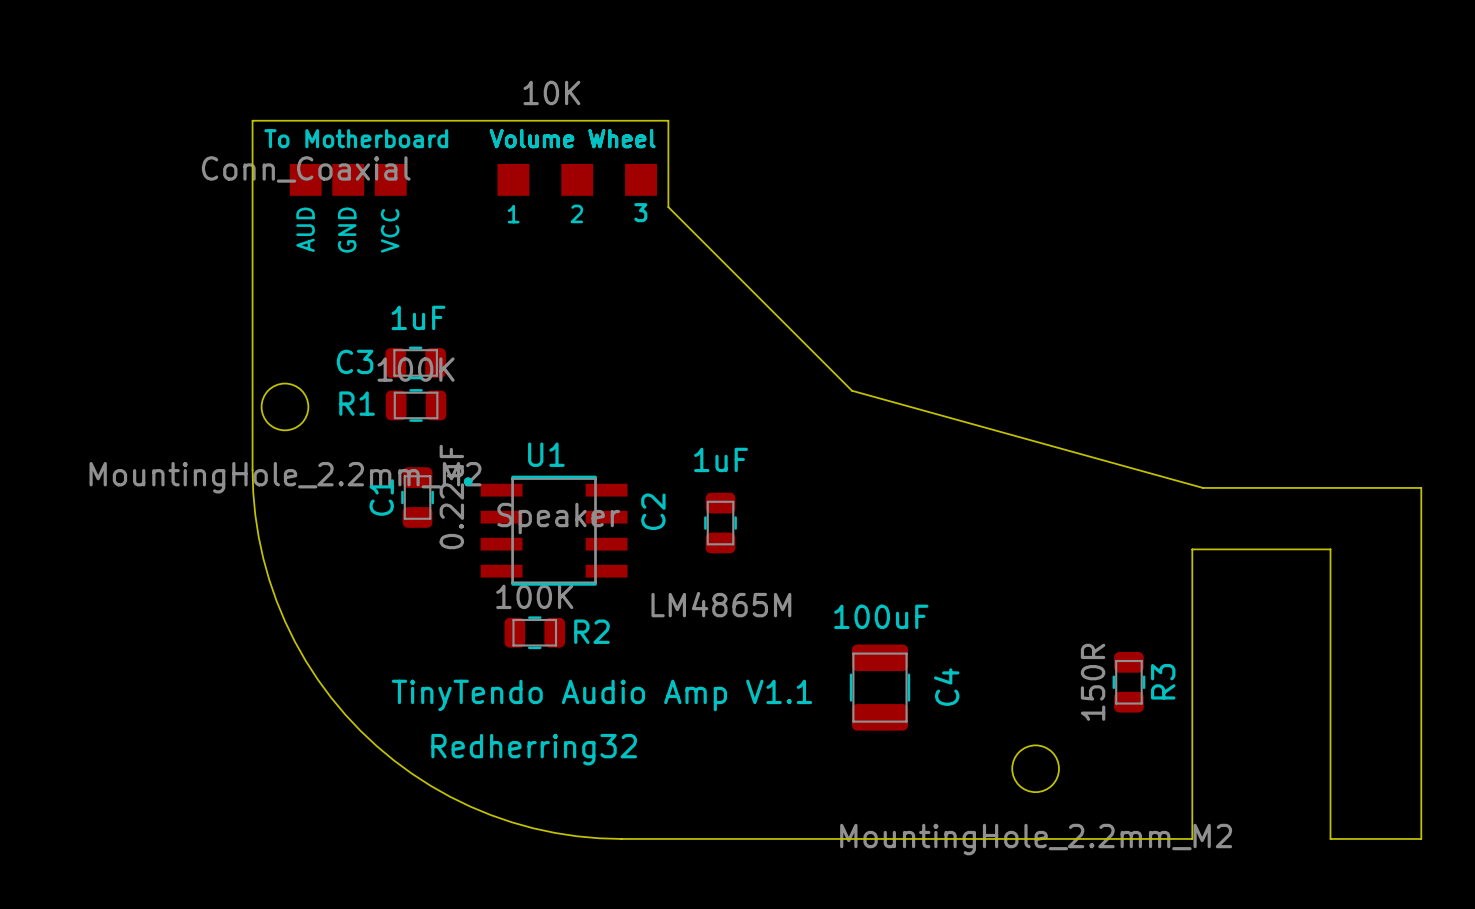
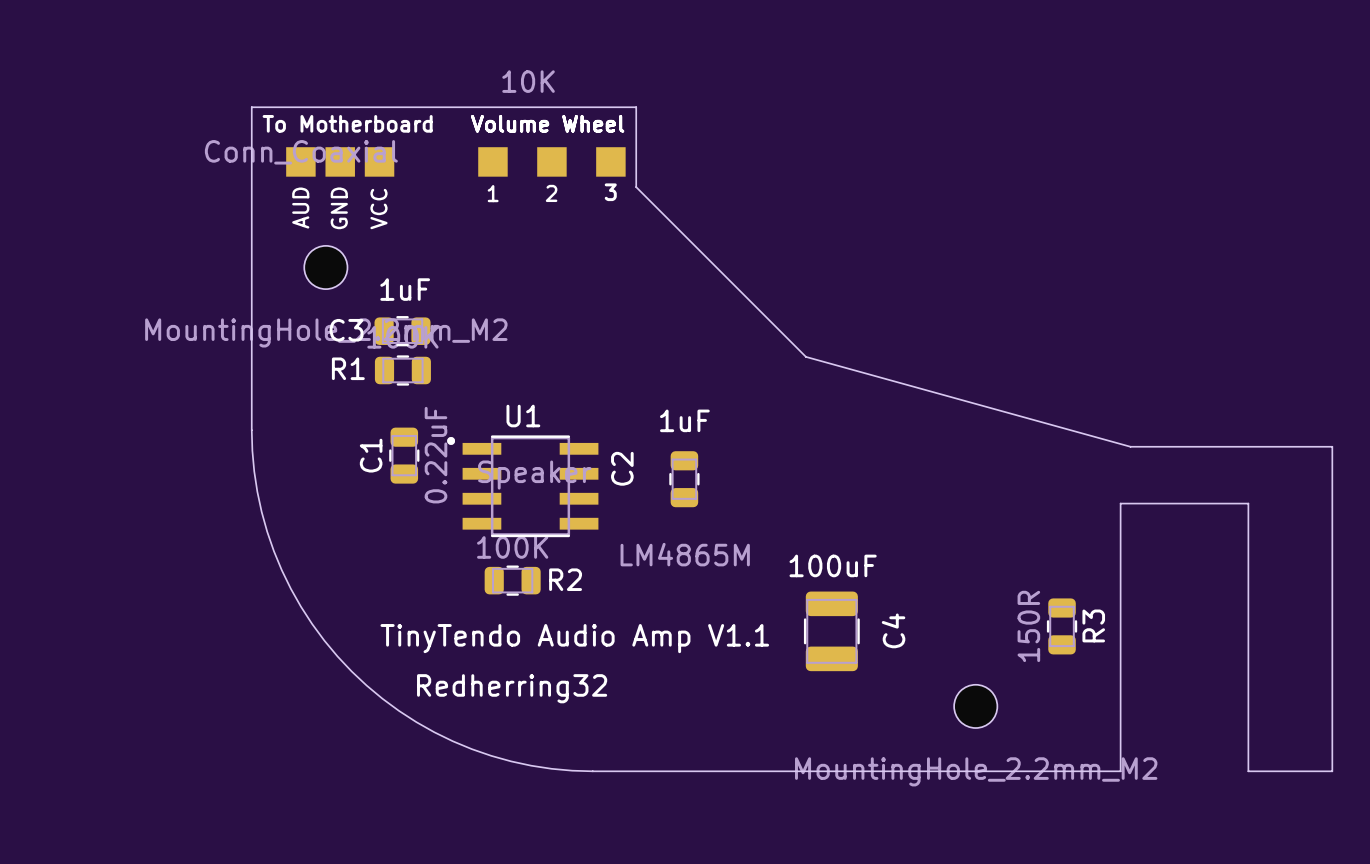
part position: (284, 406) -> (325, 267)

